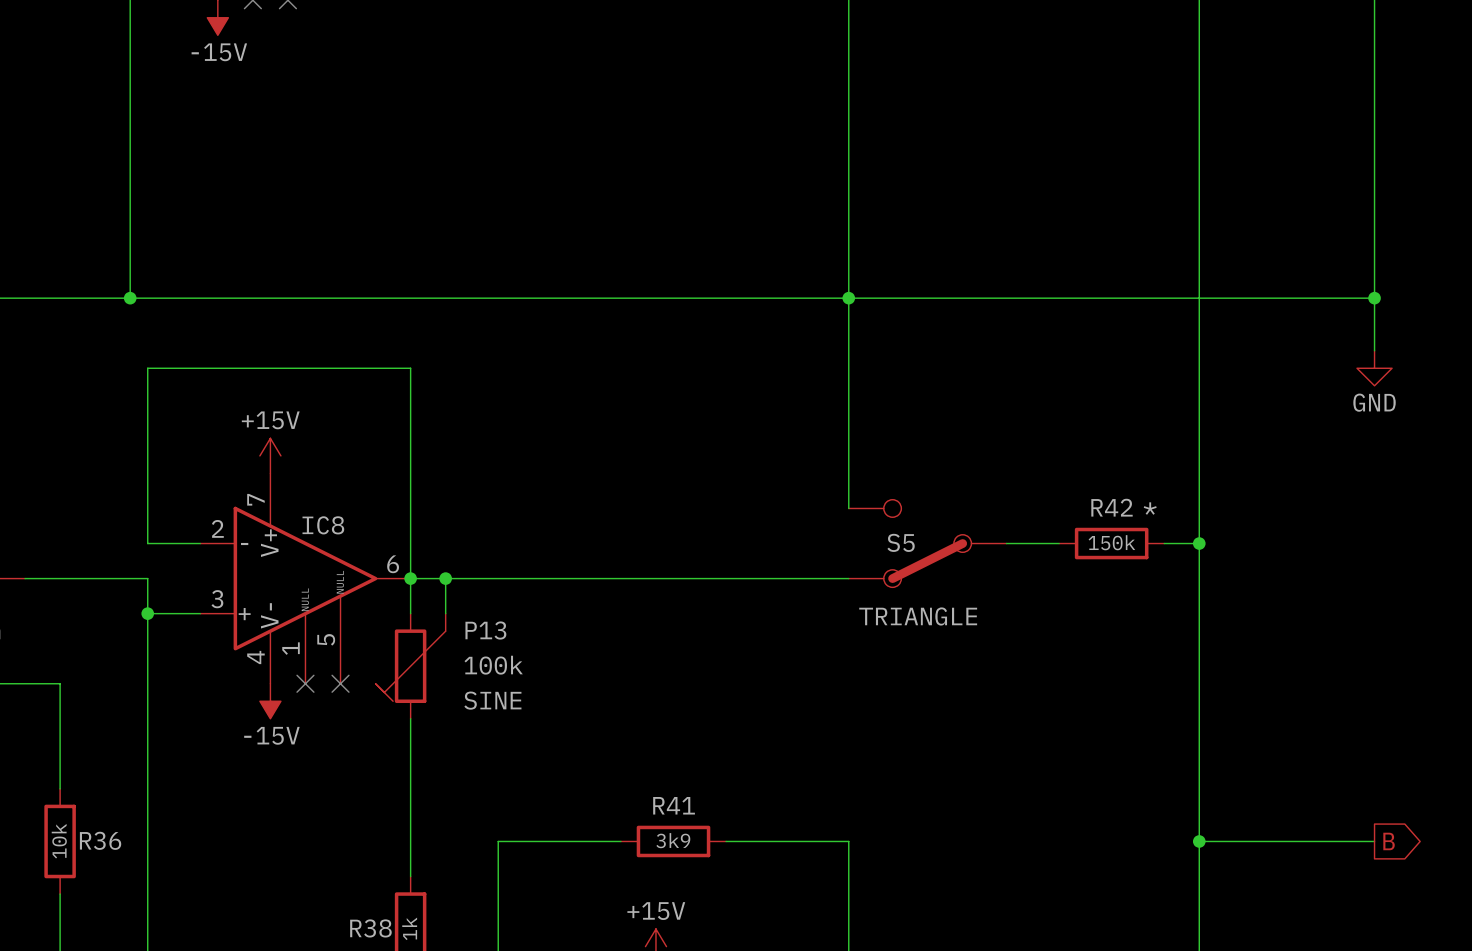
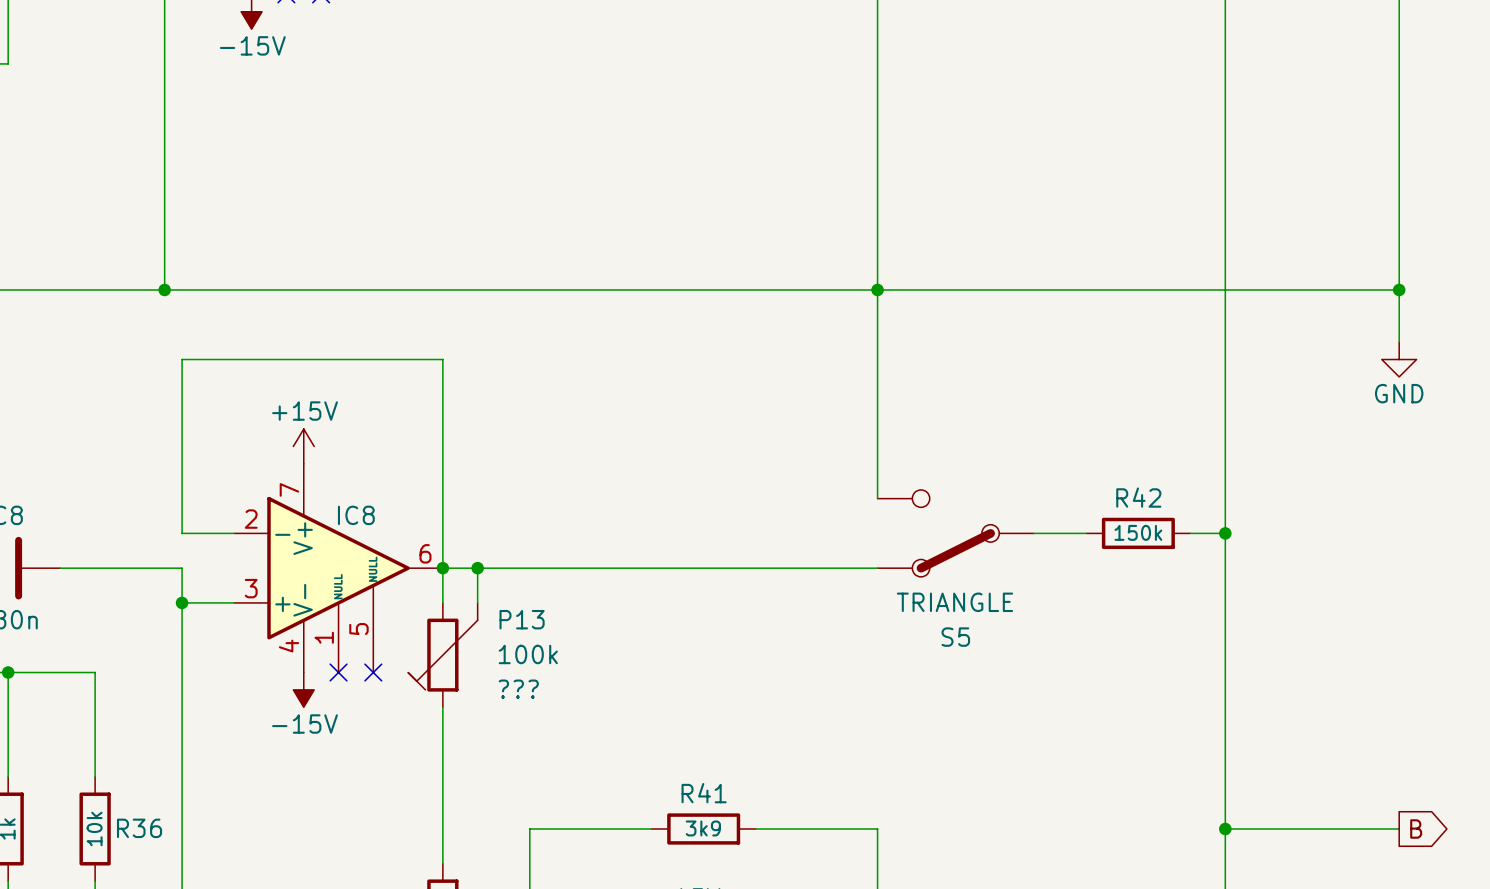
R42 text: * (1150, 508) -> none
S5 name position: S5 (901, 542) -> S5 (955, 637)
S5 text: none -> TRIANGLE (954, 602)
S5 value: TRIANGLE (918, 616) -> none
P13 text: SINE (492, 700) -> ??? (518, 689)

